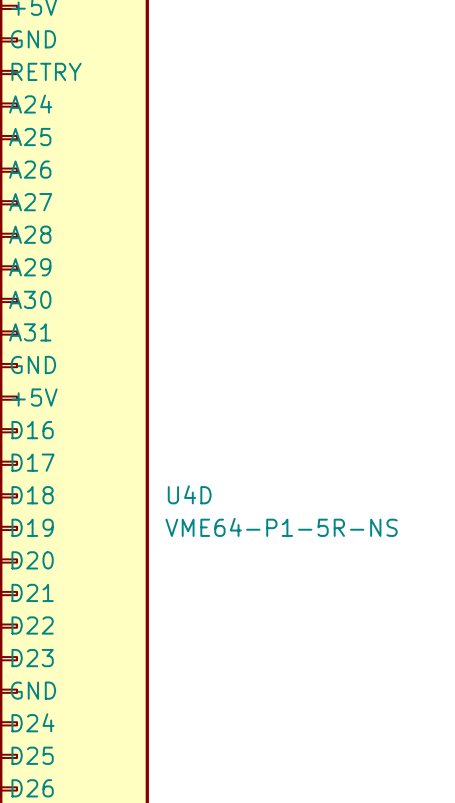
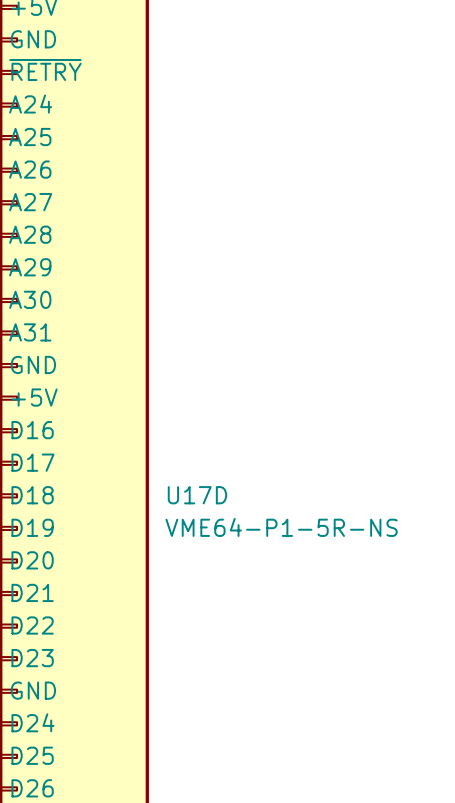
U4D pin name: RETRY (46, 71) -> ~{RETRY} (45, 70)
U4D name: U4D (189, 494) -> U17D (197, 495)

